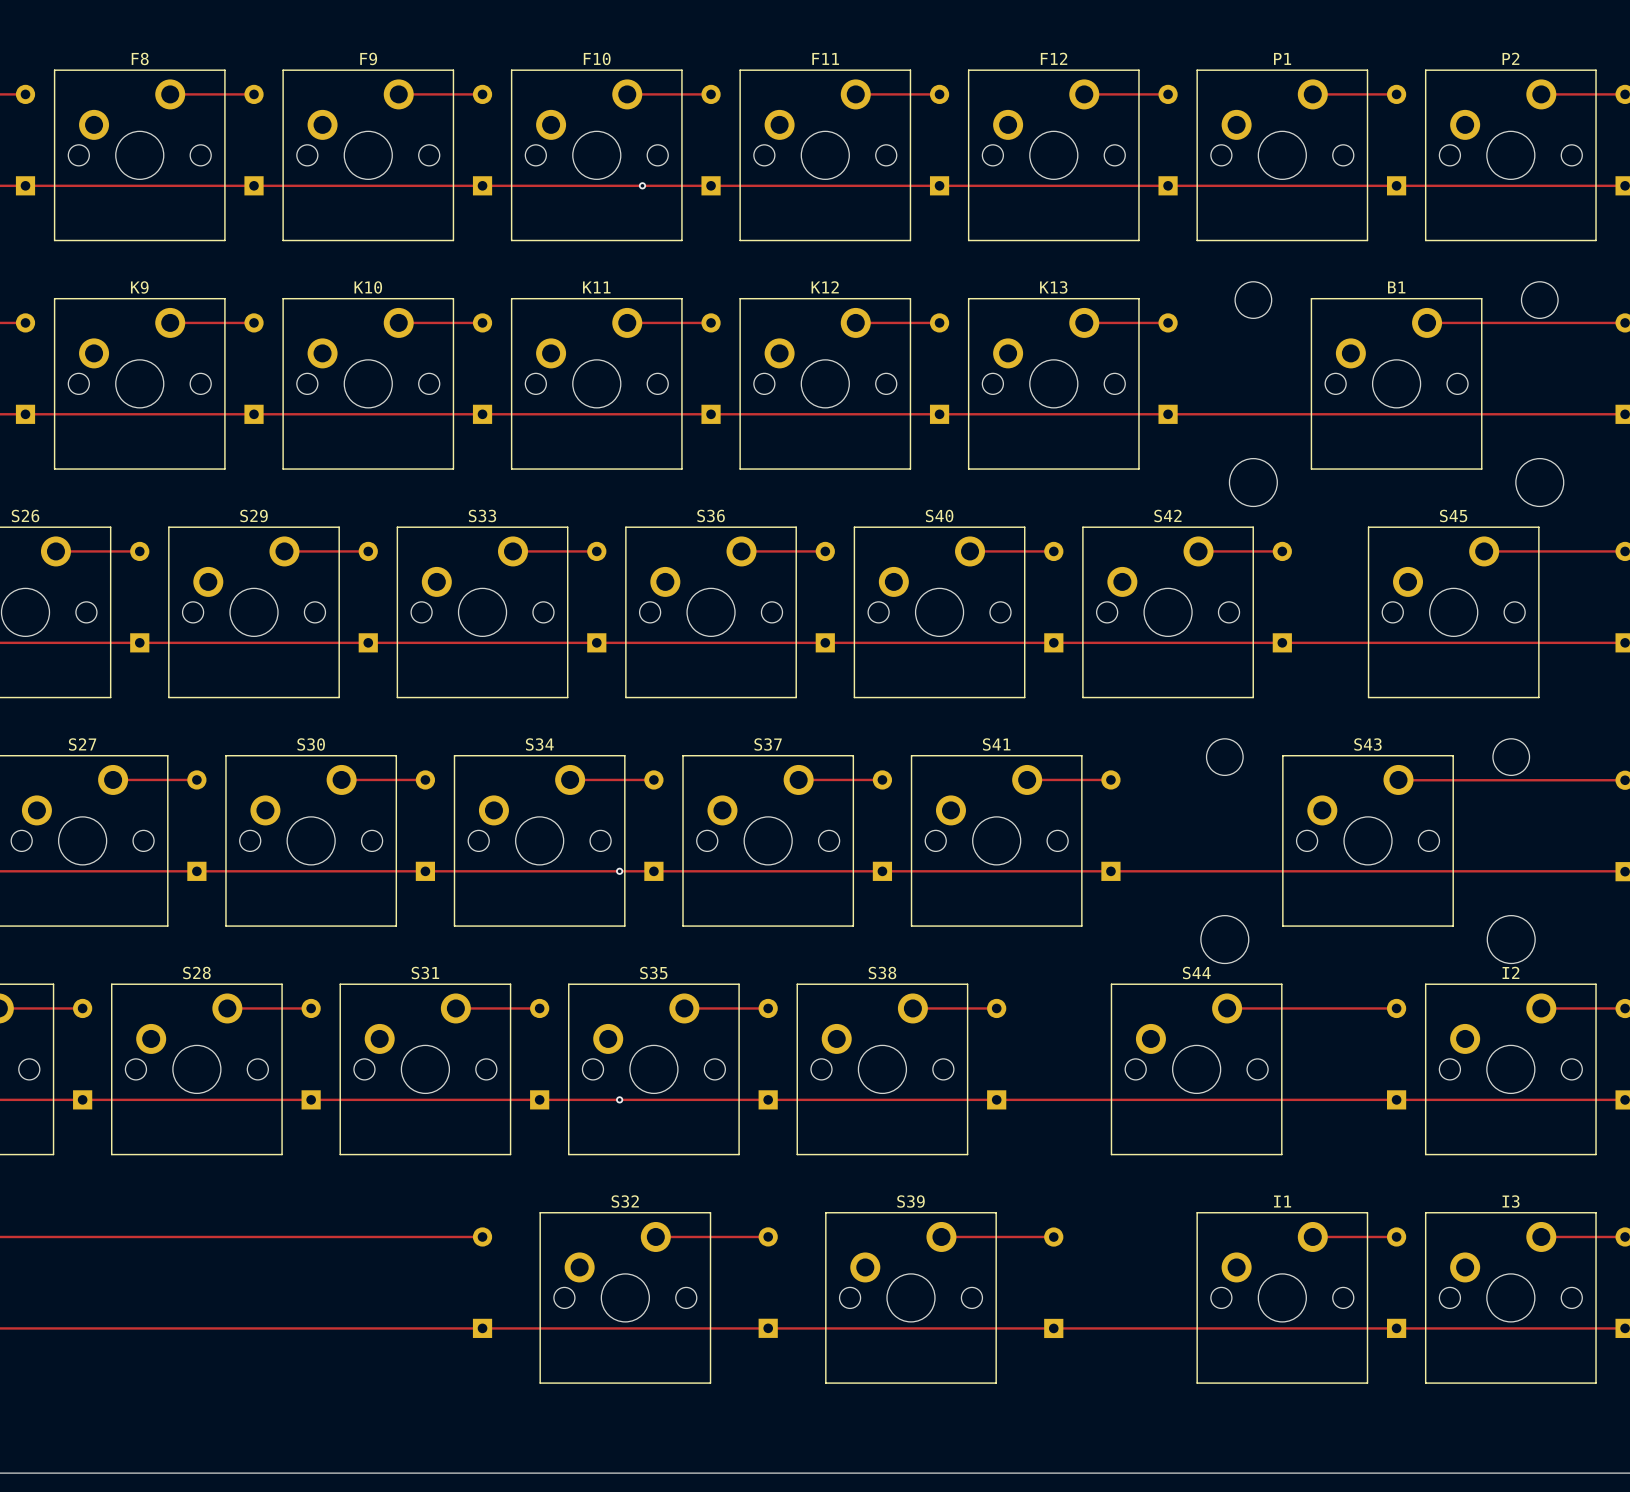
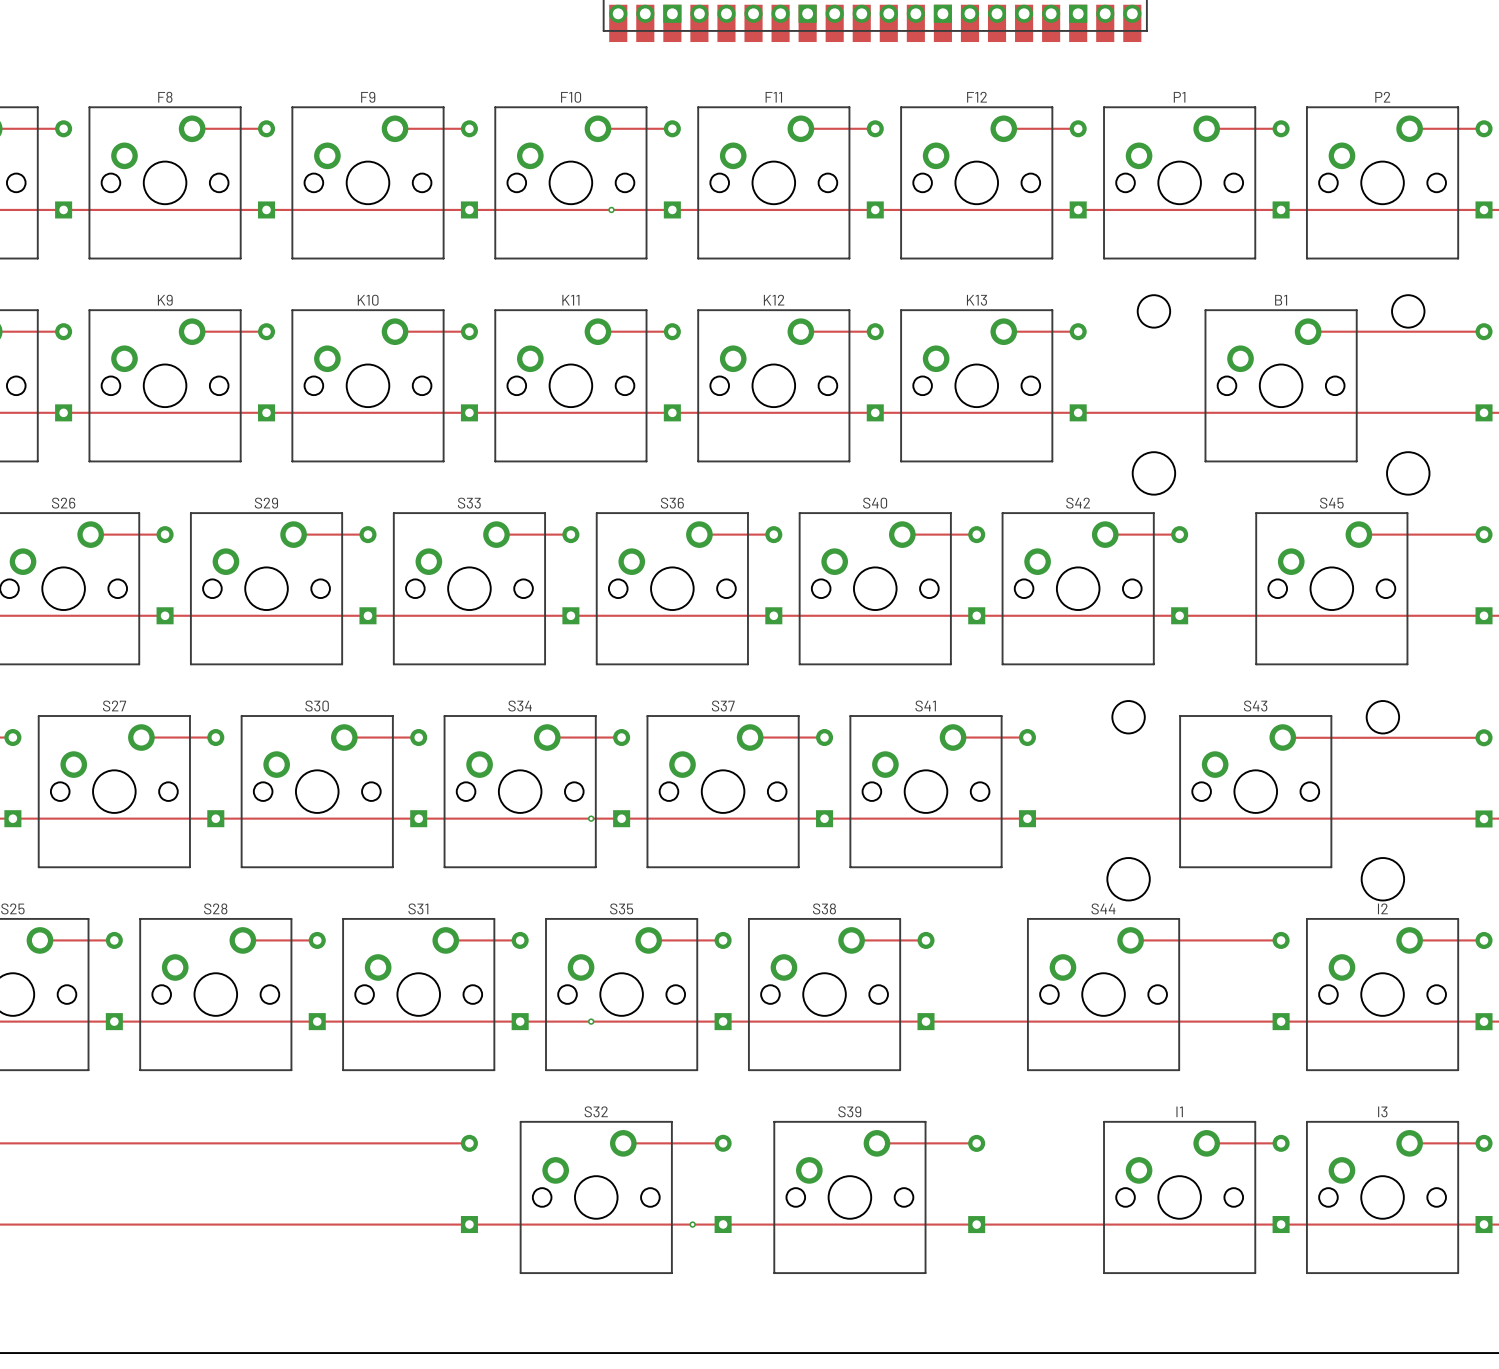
via: none -> (692, 1224)

